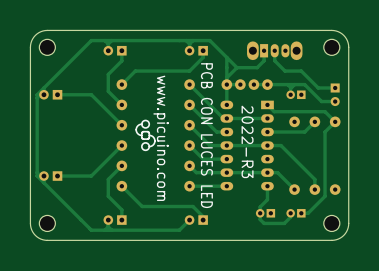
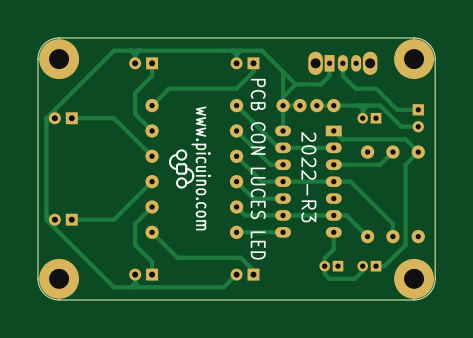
part footprint: [39, 39, 56, 56] -> [39, 39, 80, 80]
part footprint: [323, 39, 340, 56] -> [394, 39, 435, 80]
drawing shape: [135, 75, 169, 201] -> [168, 106, 211, 231]
part footprint: [39, 215, 56, 232] -> [39, 258, 80, 299]
part footprint: [323, 215, 340, 232] -> [394, 258, 435, 299]

